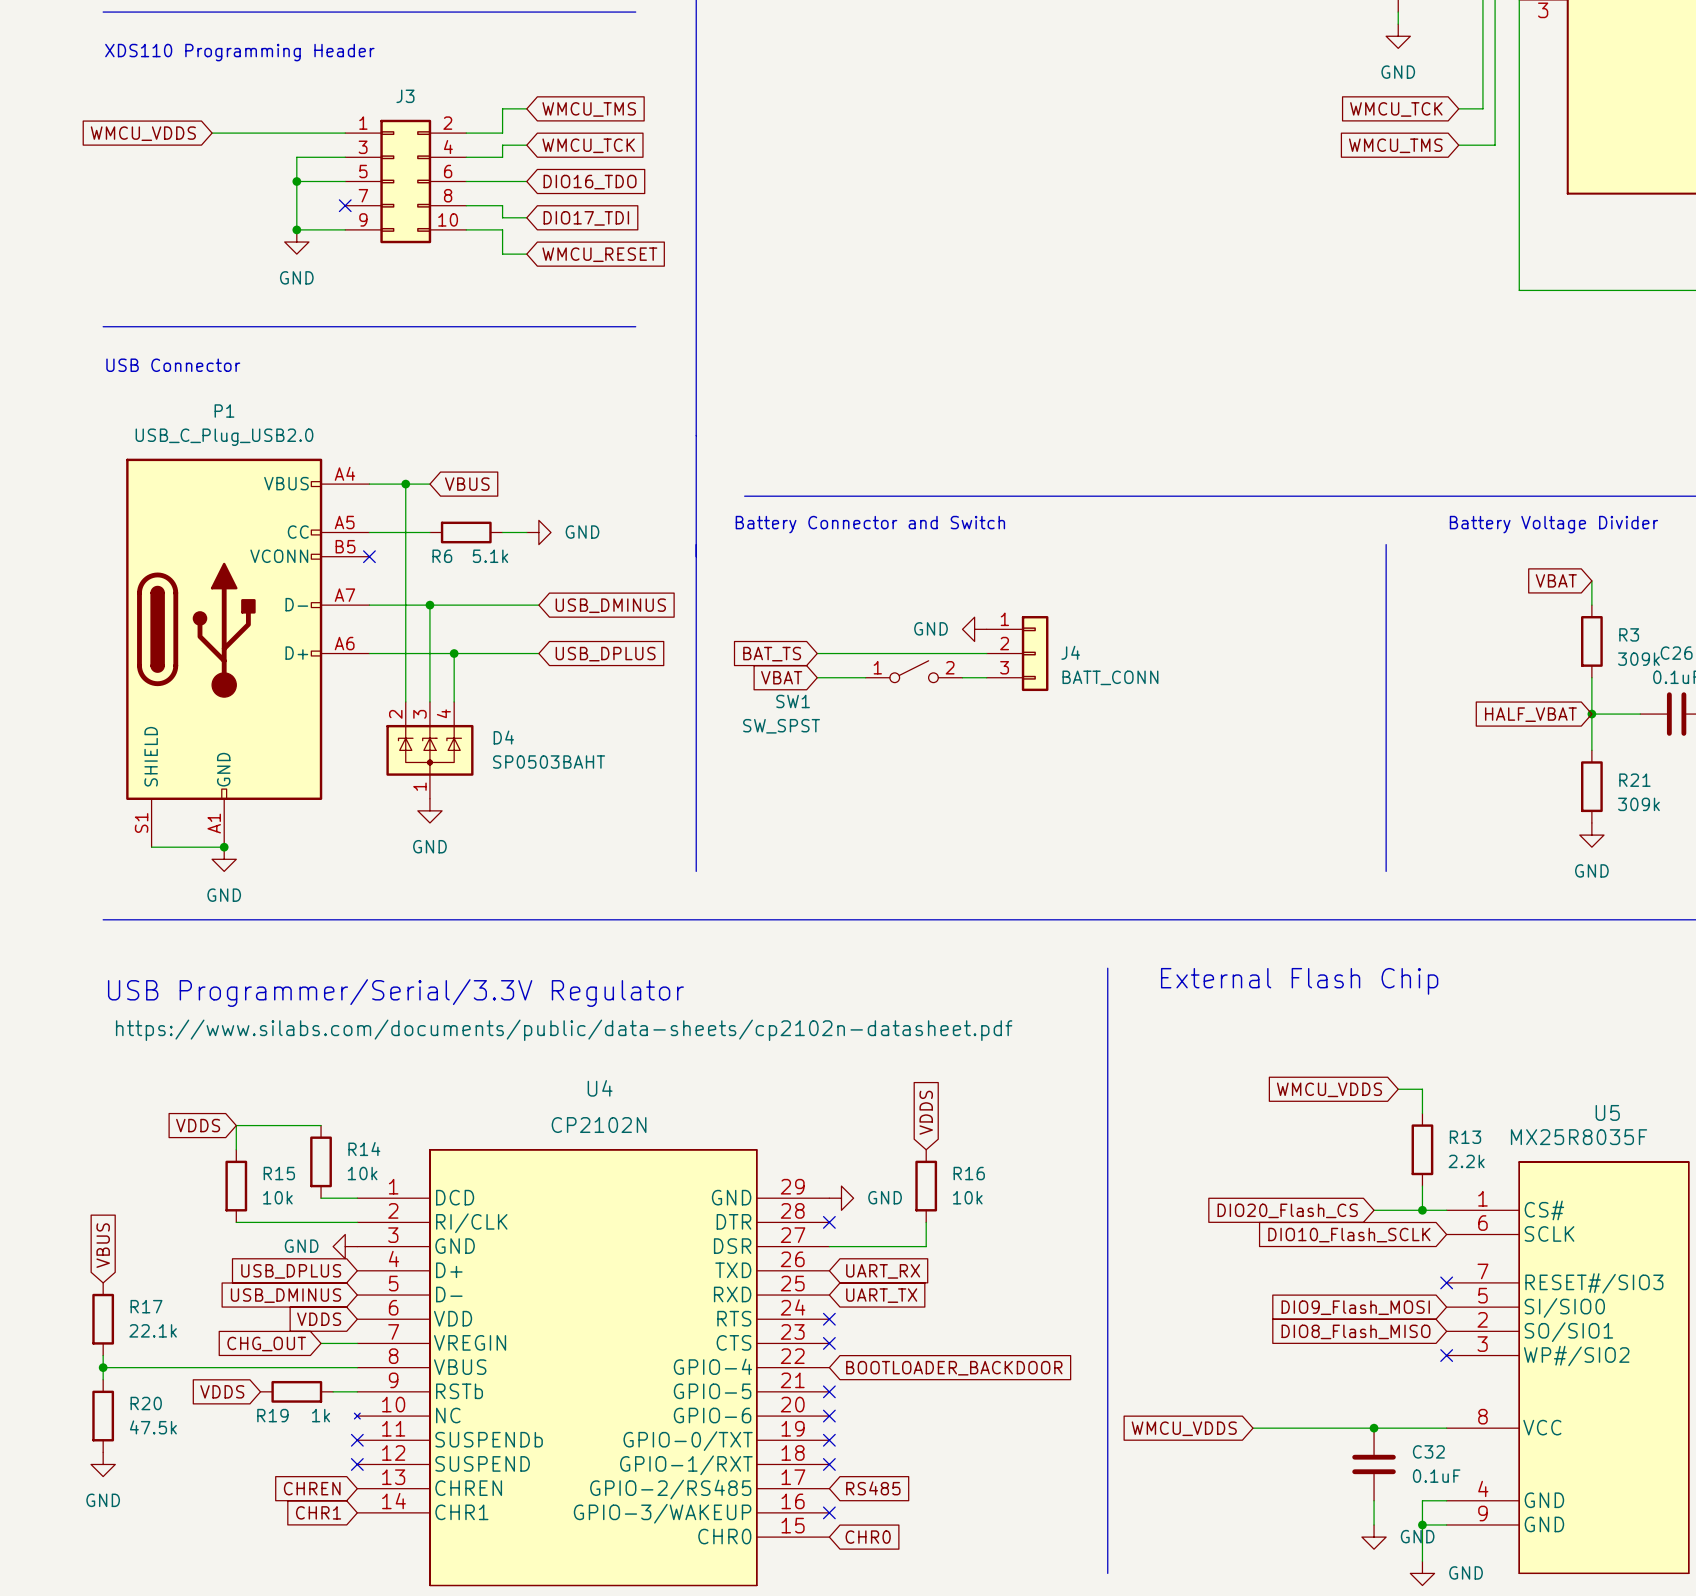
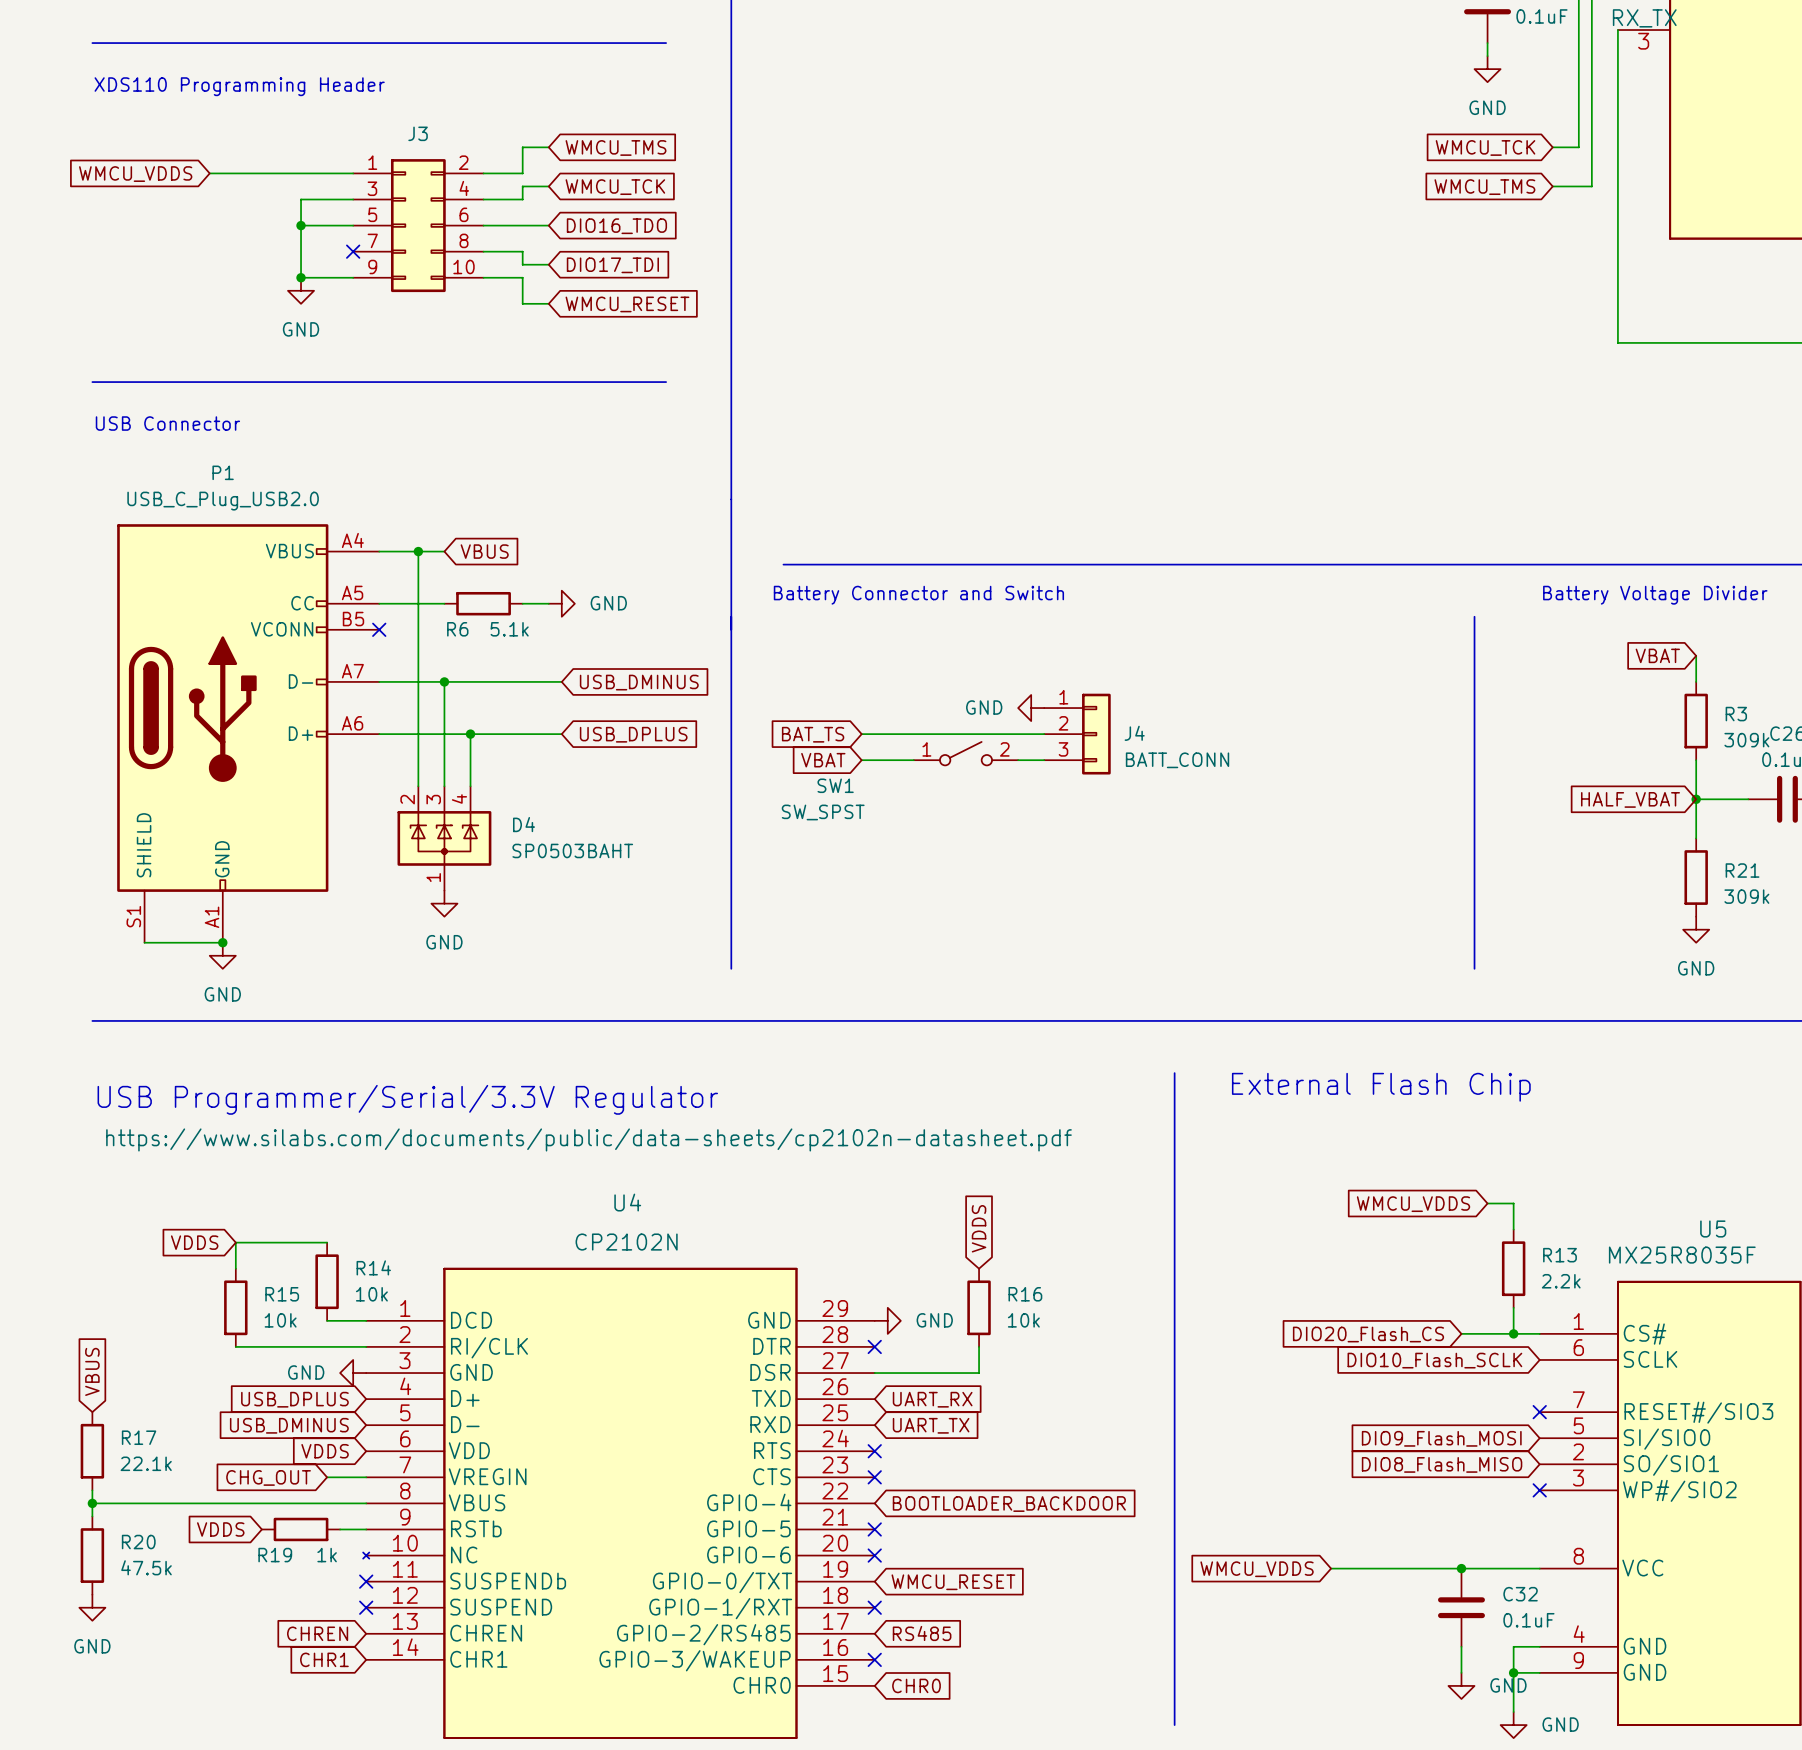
no-connect mark: (829, 1440) -> none
global label: none -> WMCU_RESET (953, 1582)

